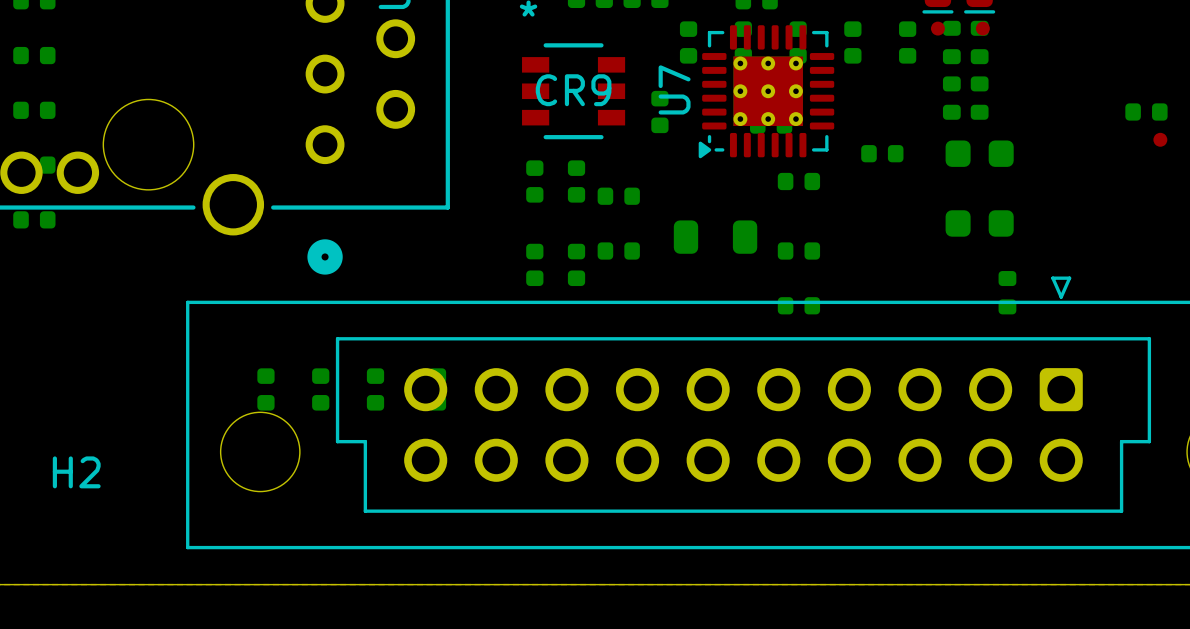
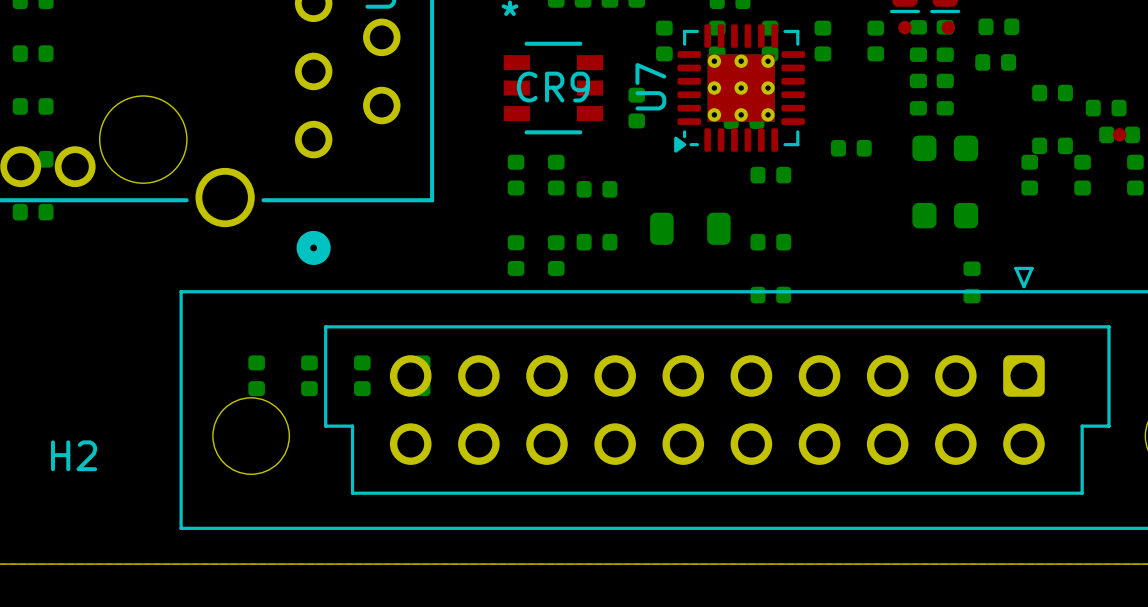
part: none -> (998, 26)
part: none -> (995, 62)
part: none -> (1052, 93)
part: none -> (1119, 134)
part: none -> (1052, 145)
part: none -> (1029, 175)
part: none -> (1082, 175)
part: none -> (1135, 175)

